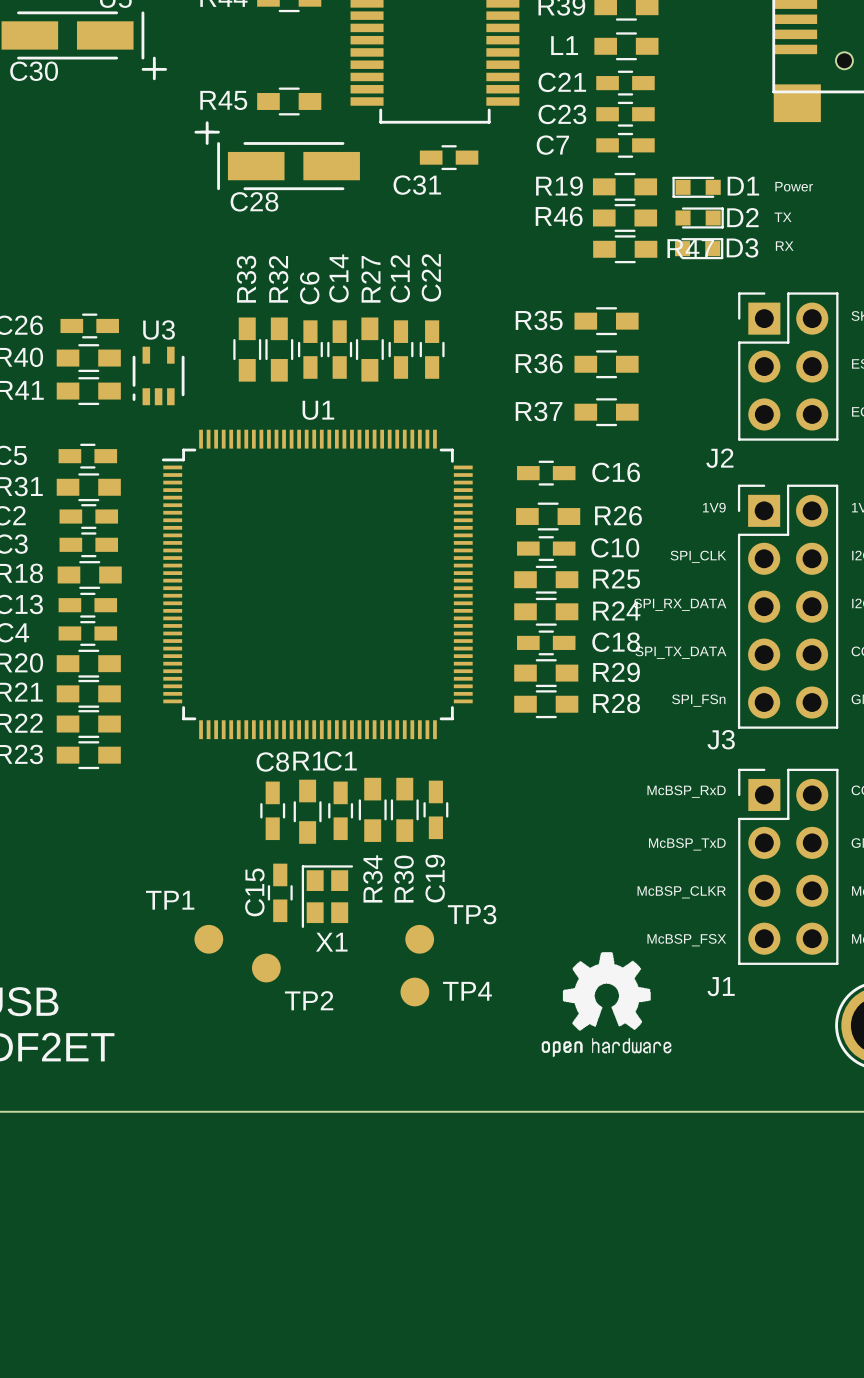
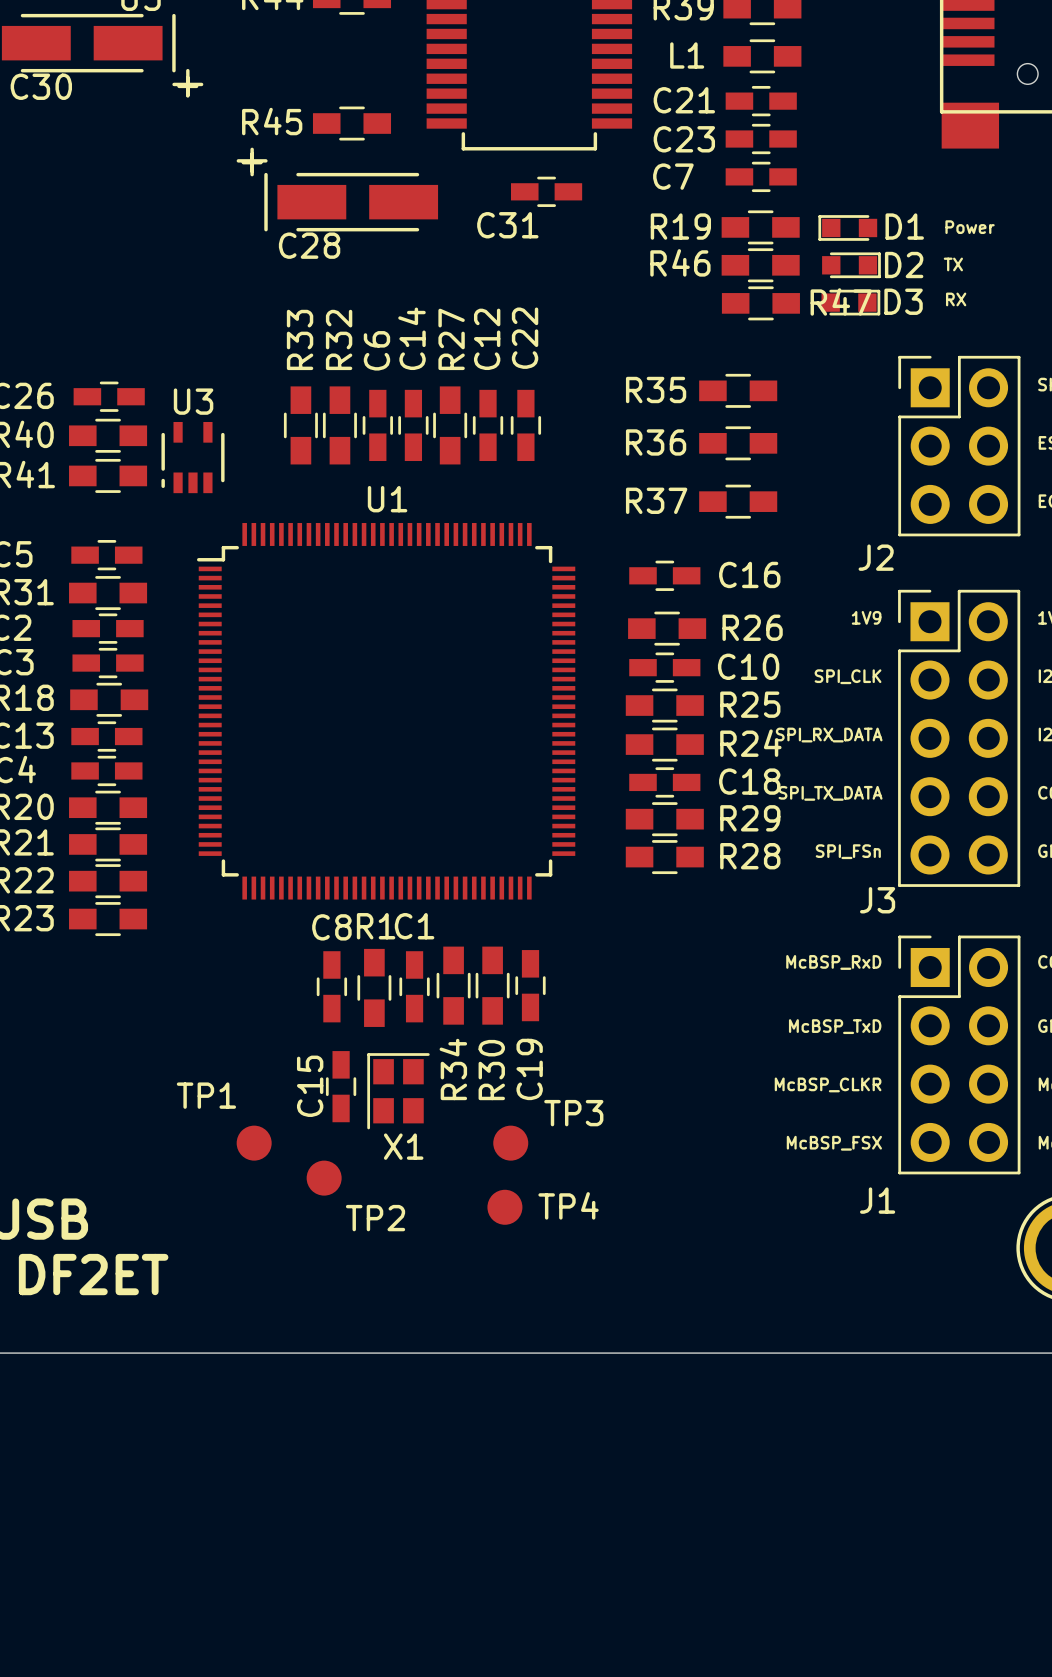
drawing: [541, 952, 672, 1058] -> none

